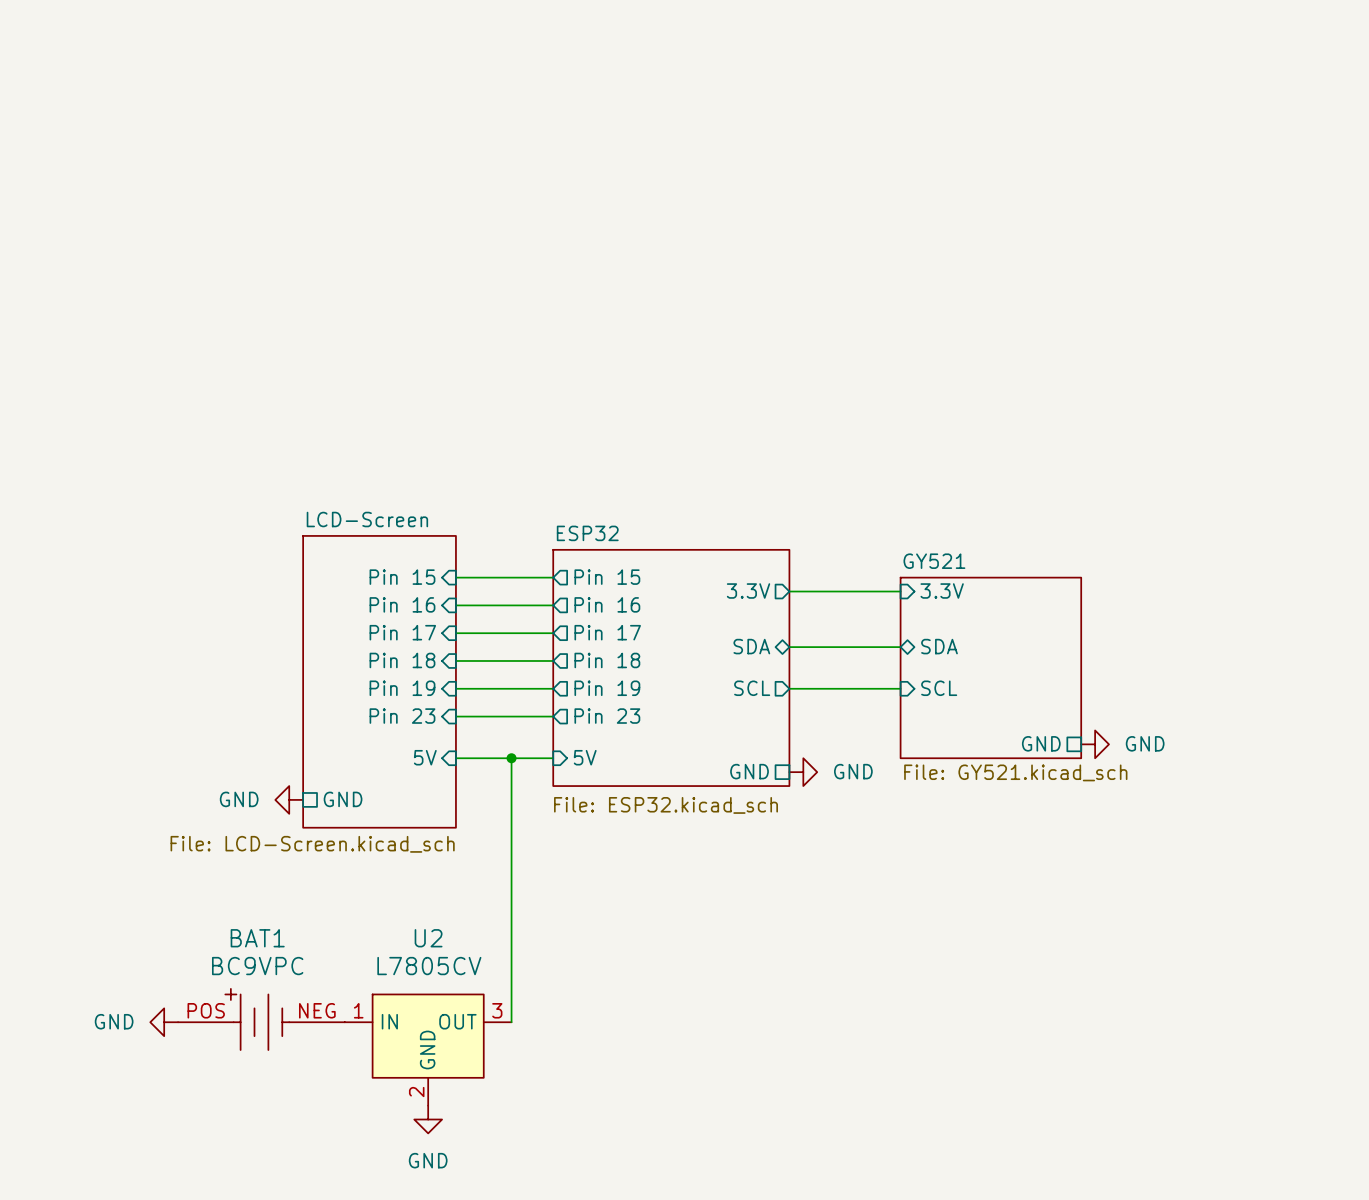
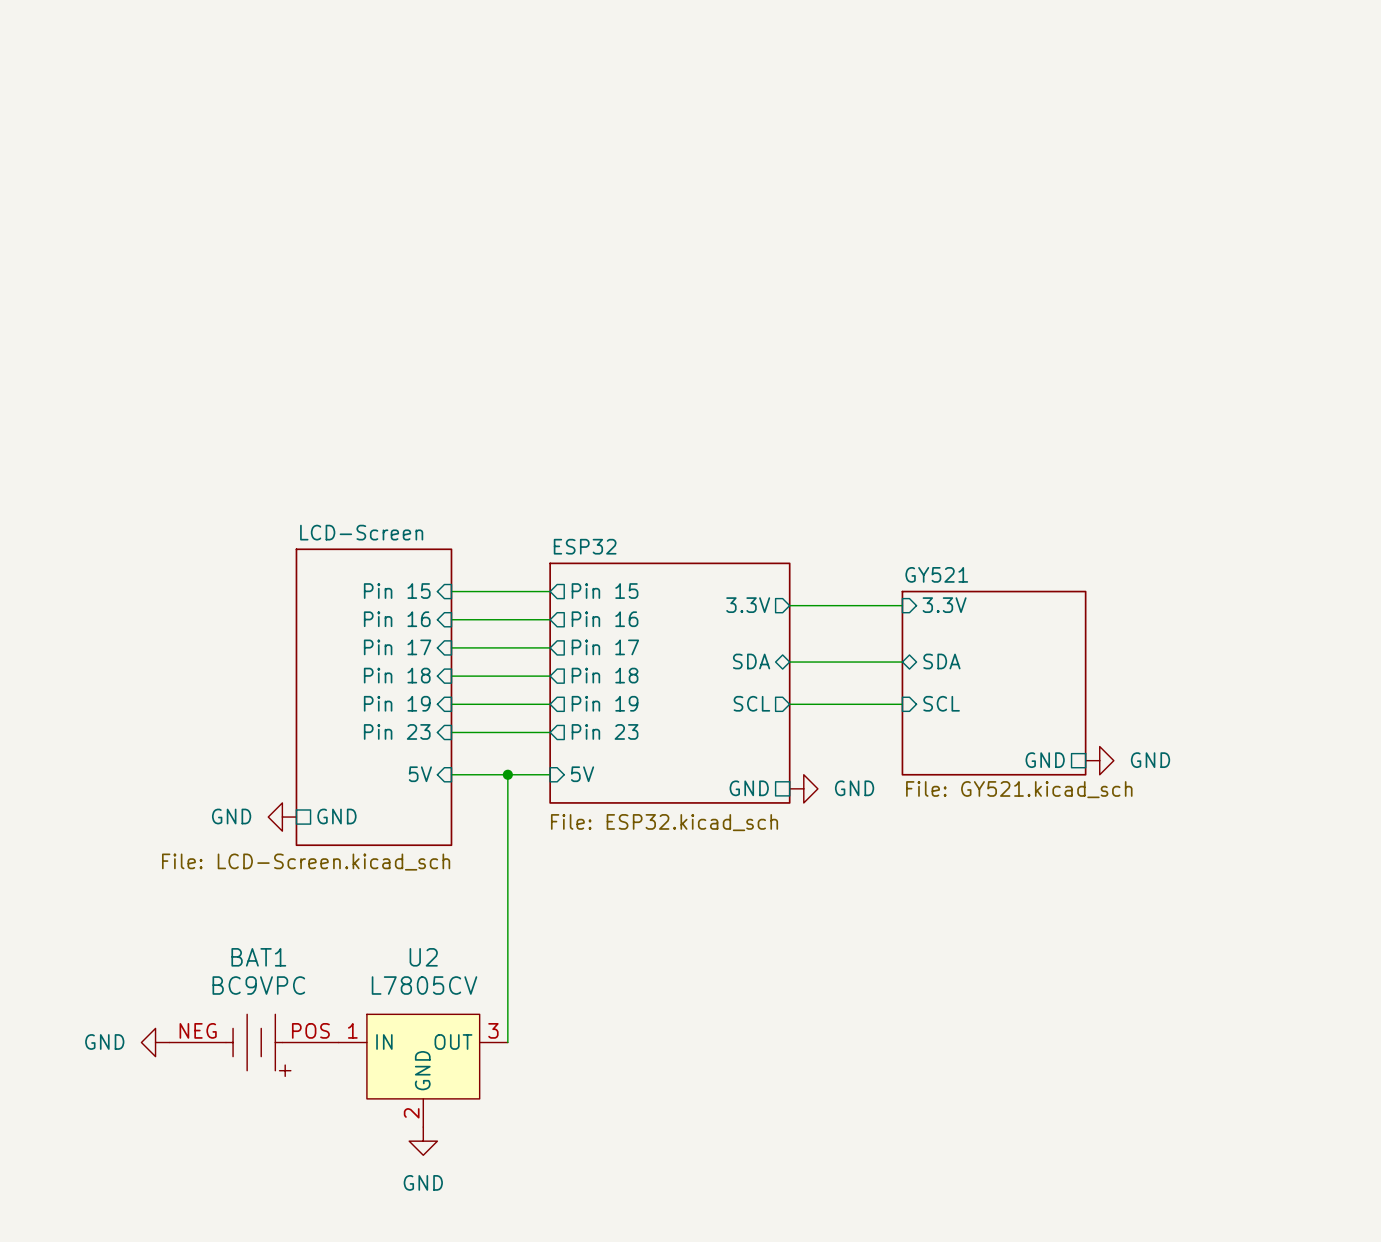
BAT1 rotation: 0° (257, 1019) -> 180° (258, 1045)

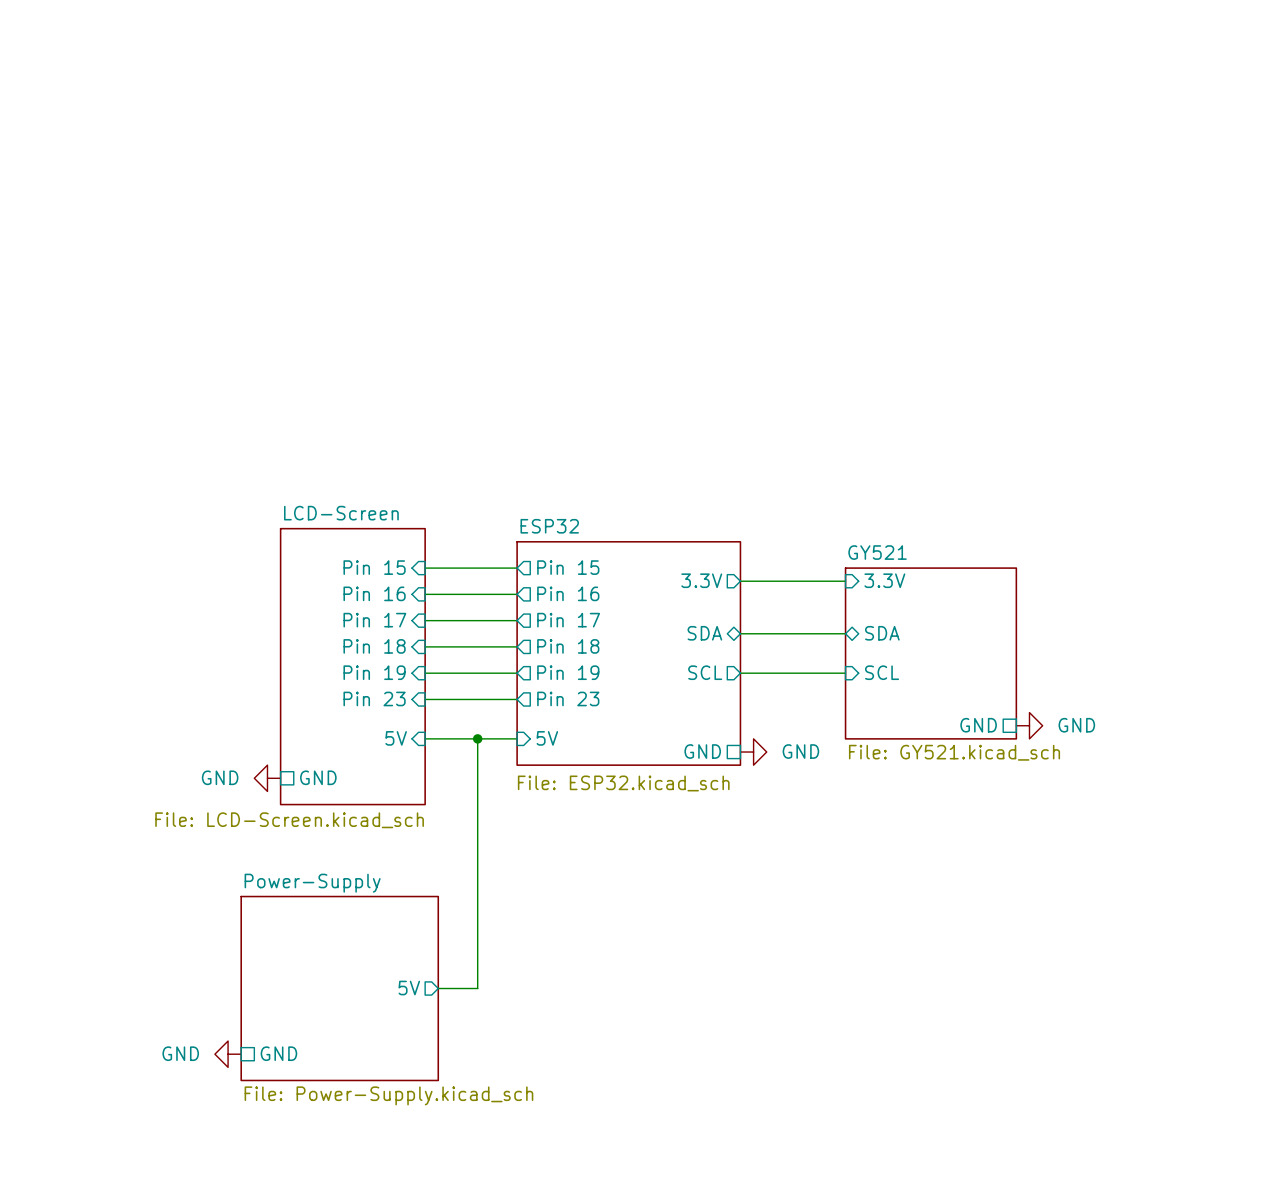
sheet pin: none -> 5V (409, 988)
power symbol: GND (155, 1042) -> none
sheet Power-Supply: none -> File: Power-Supply.kicad_sch (339, 988)
BAT1: BC9VPC (254, 1045) -> none
U2: L7805CV (423, 1070) -> none
power symbol: none -> GND (228, 1054)
sheet pin: none -> GND (278, 1053)
power symbol: GND (423, 1141) -> none

